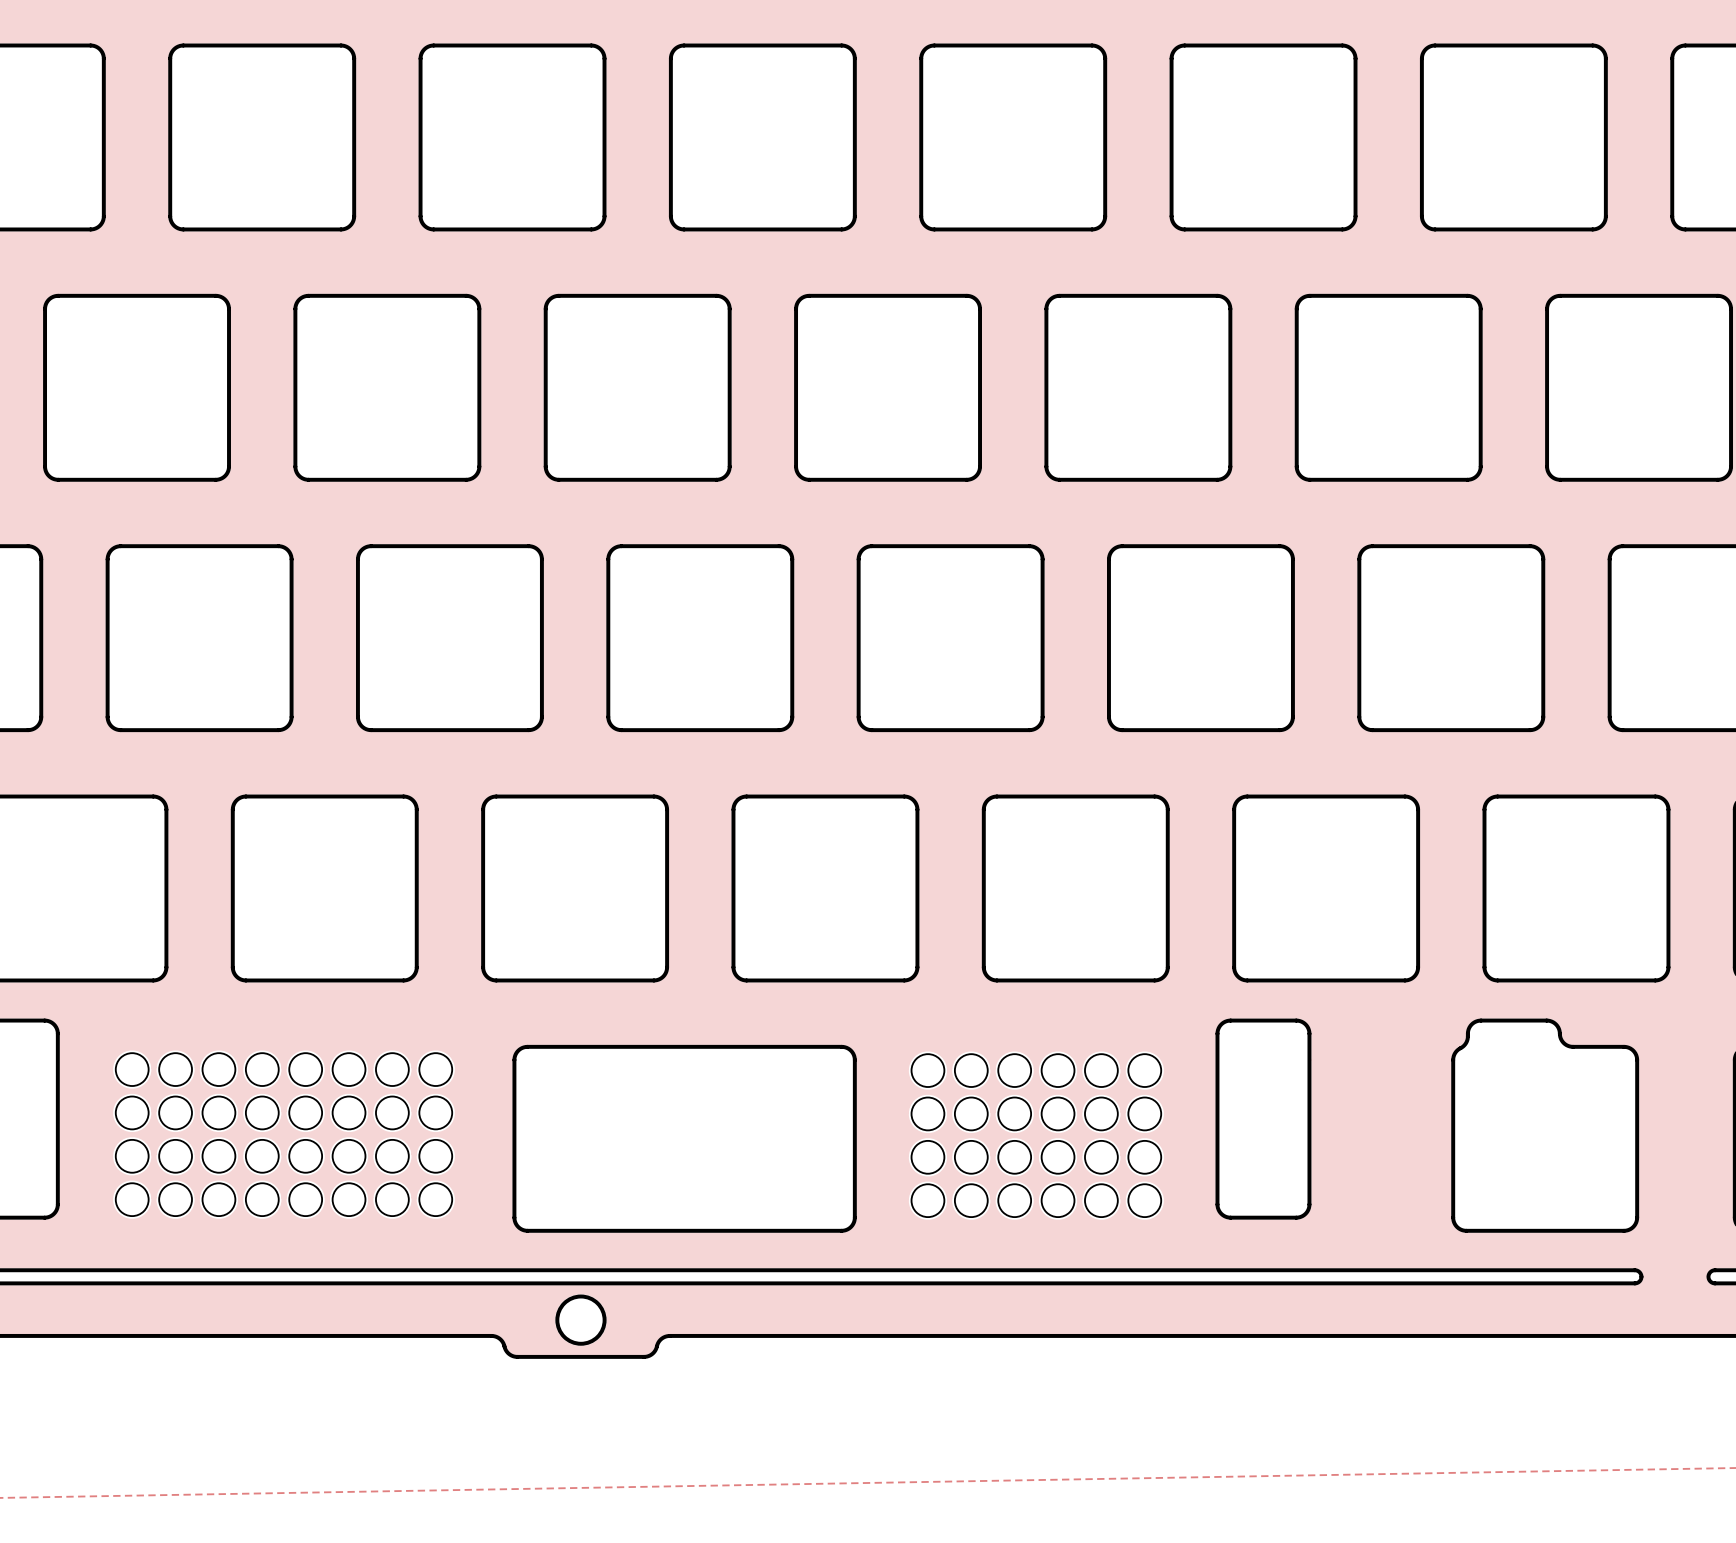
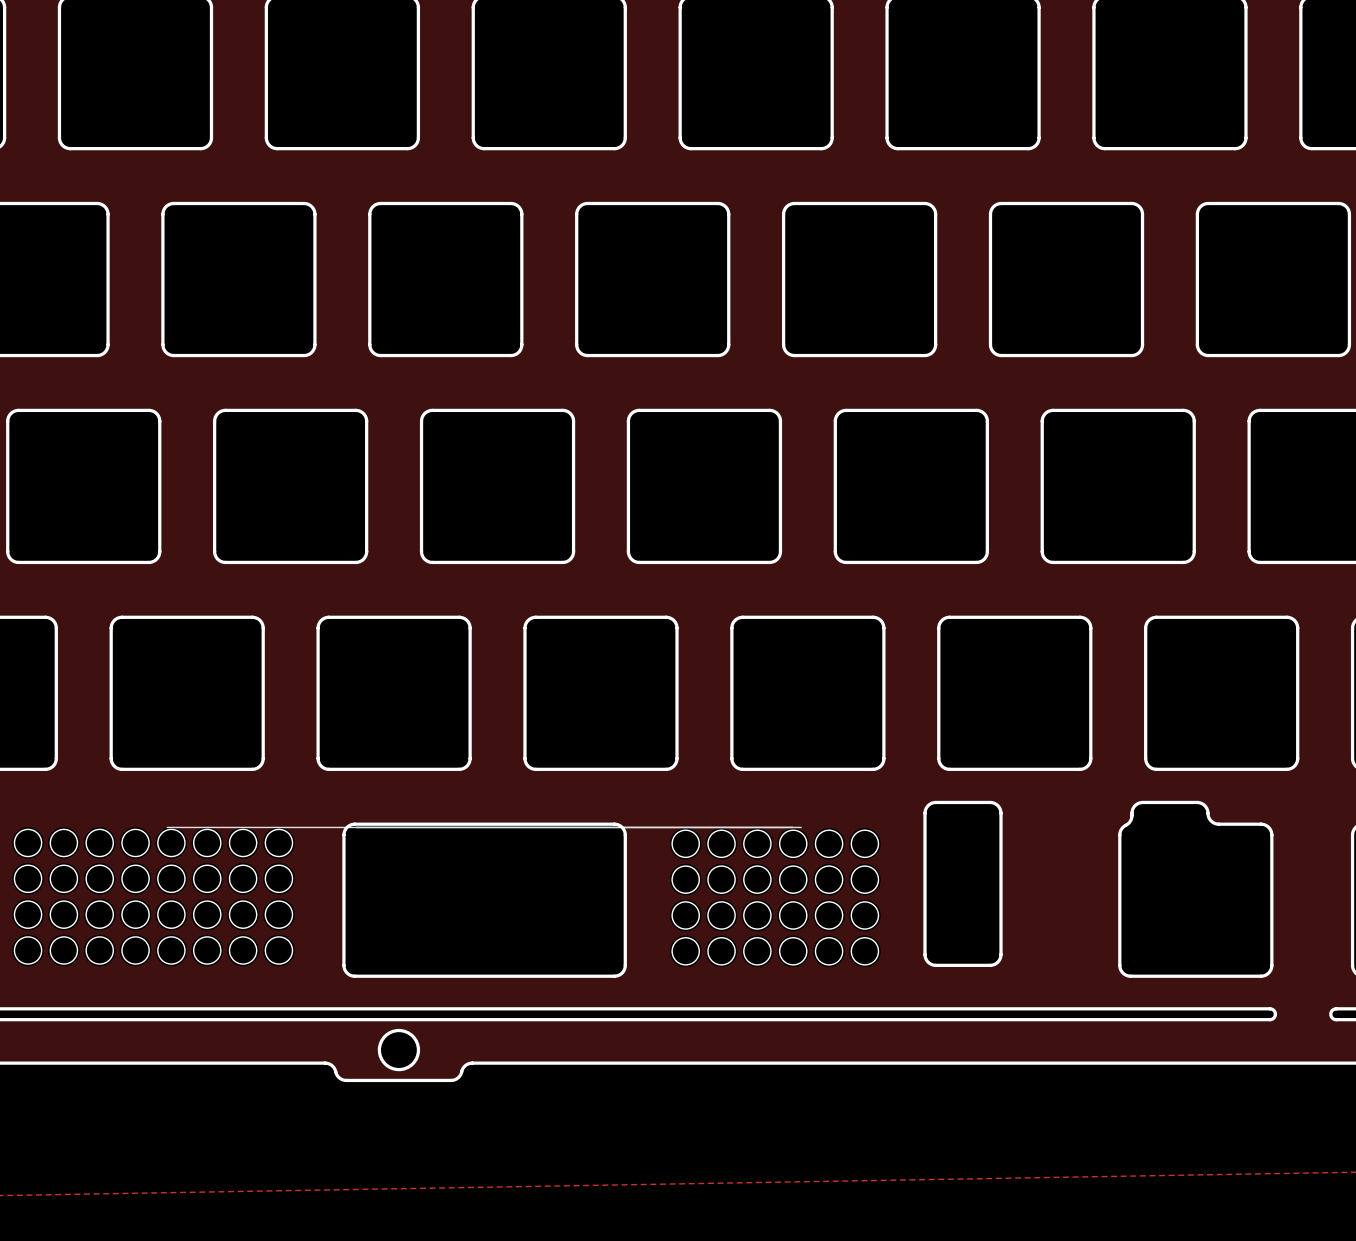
line: none -> (167, 827) (801, 827)

